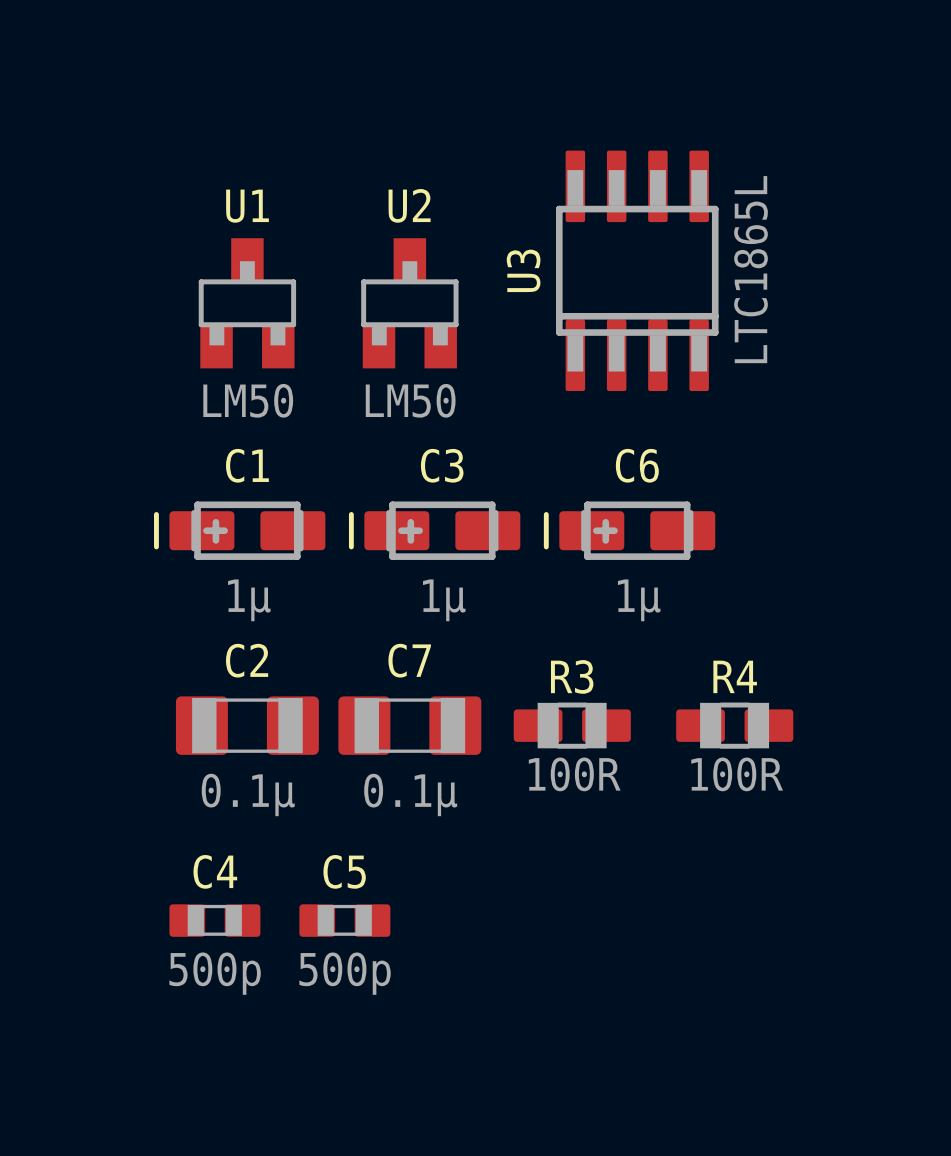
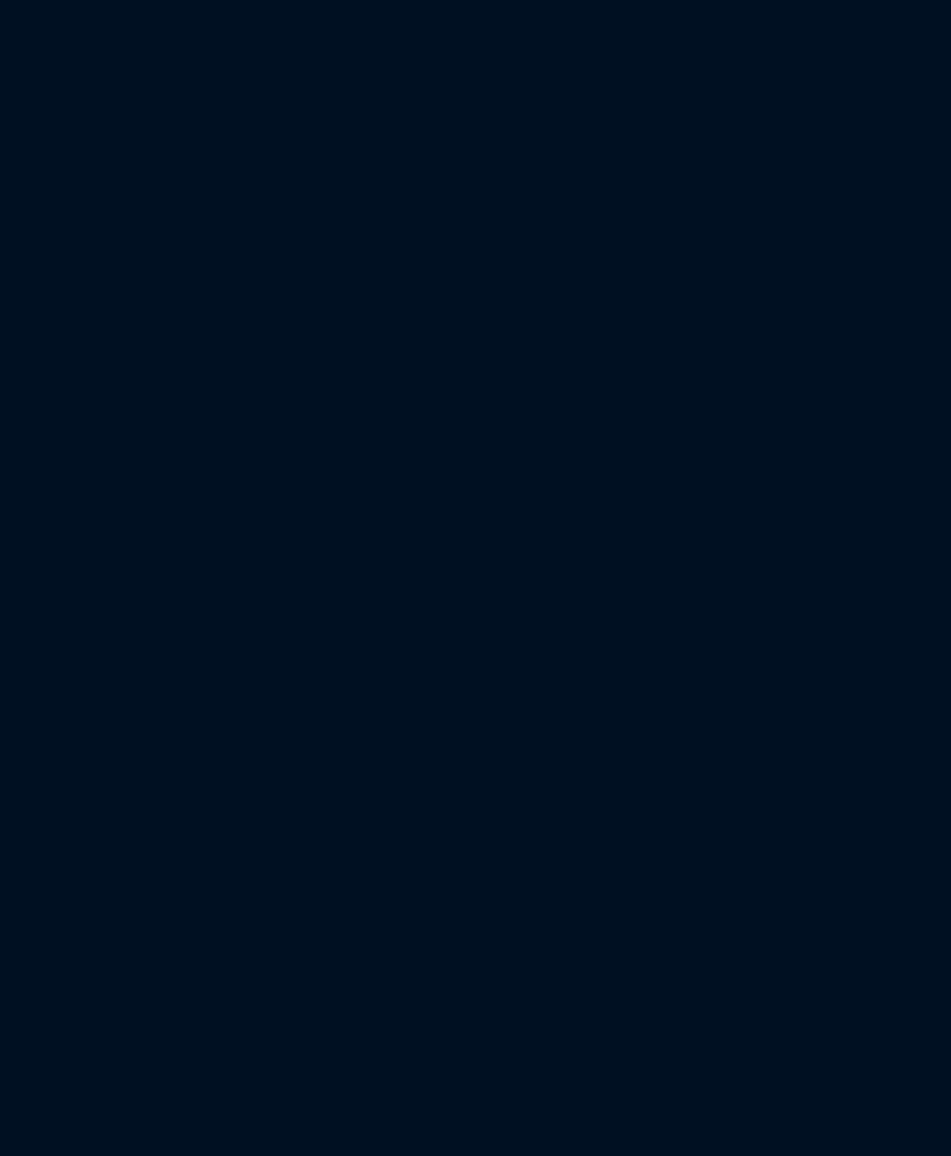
U3: LTC1865L (637, 270) -> none
U1: LM50 (247, 303) -> none
U2: LM50 (409, 303) -> none
C1: 1µ (239, 530) -> none
C3: 1µ (434, 530) -> none
C6: 1µ (629, 530) -> none
C2: 0.1µ (247, 725) -> none
C7: 0.1µ (409, 725) -> none
R3: 100R (572, 725) -> none
R4: 100R (734, 725) -> none
C4: 500p (214, 920) -> none
C5: 500p (344, 920) -> none

